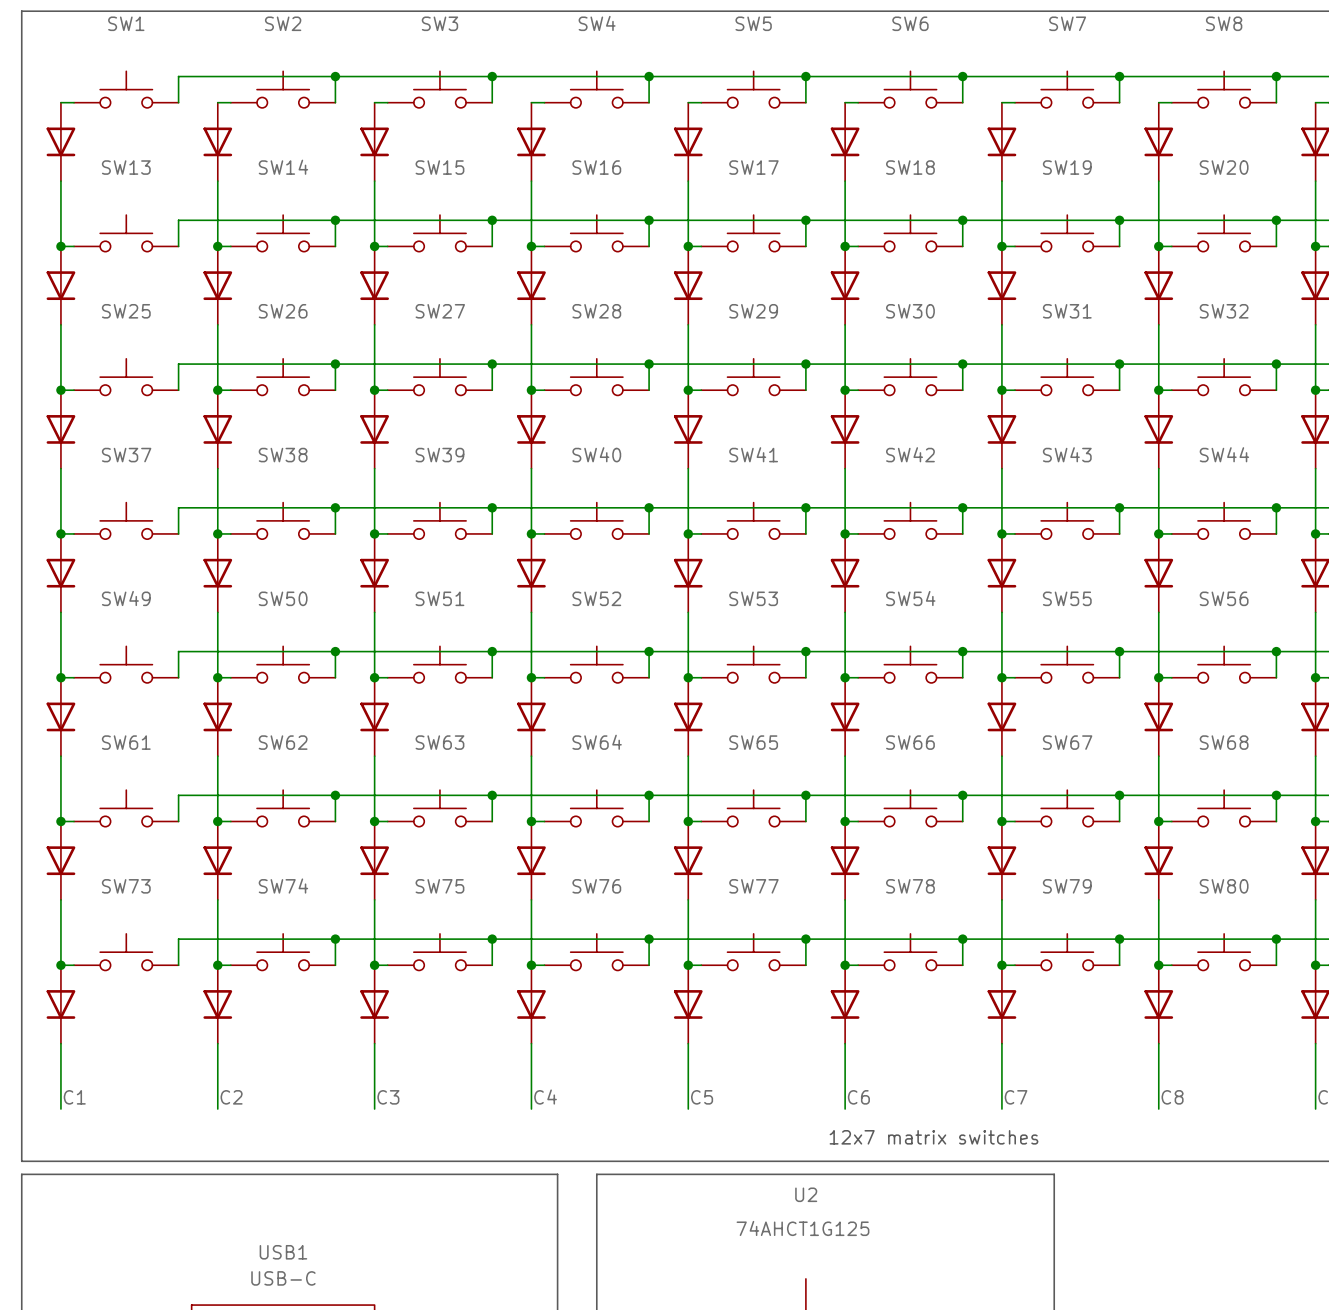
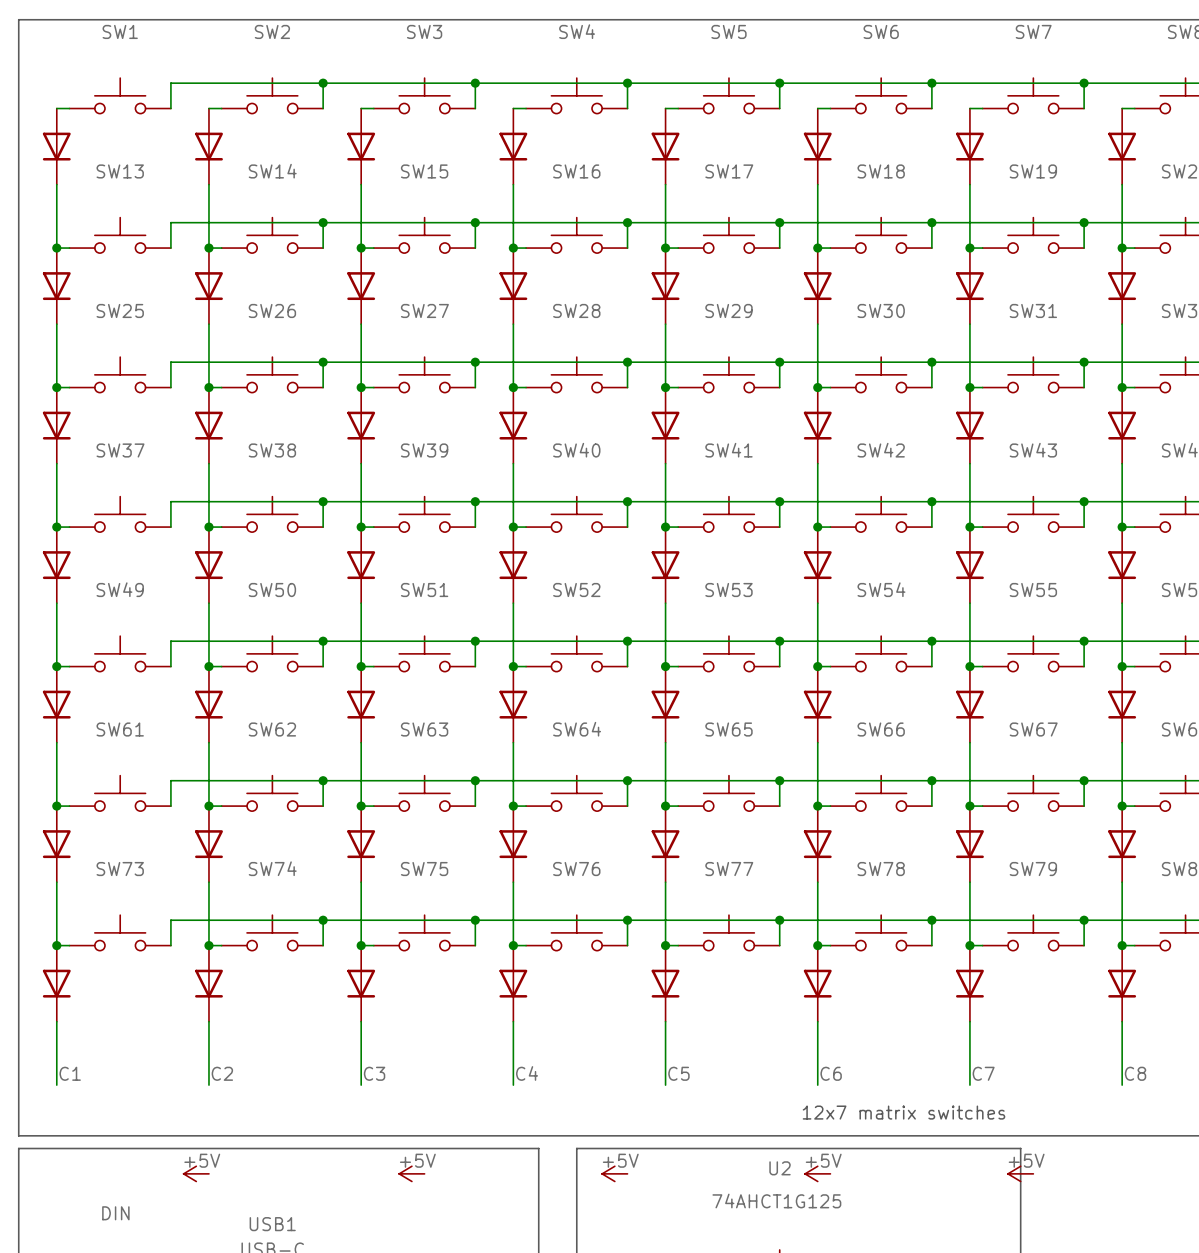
power symbol: none -> +5V (196, 1173)
power symbol: none -> +5V (411, 1173)
power symbol: none -> +5V (614, 1173)
power symbol: none -> +5V (817, 1173)
power symbol: none -> +5V (1020, 1173)
label: none -> DIN (115, 1213)

